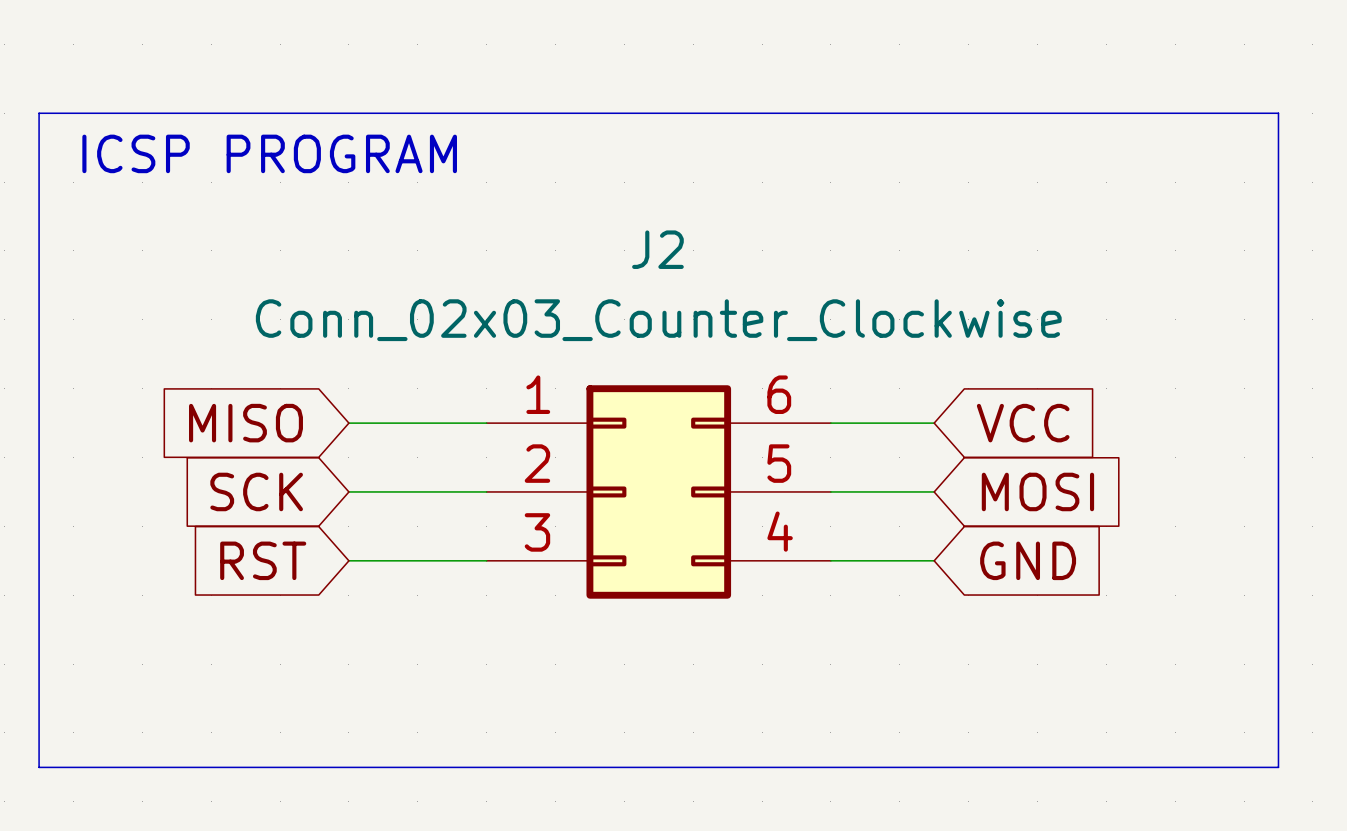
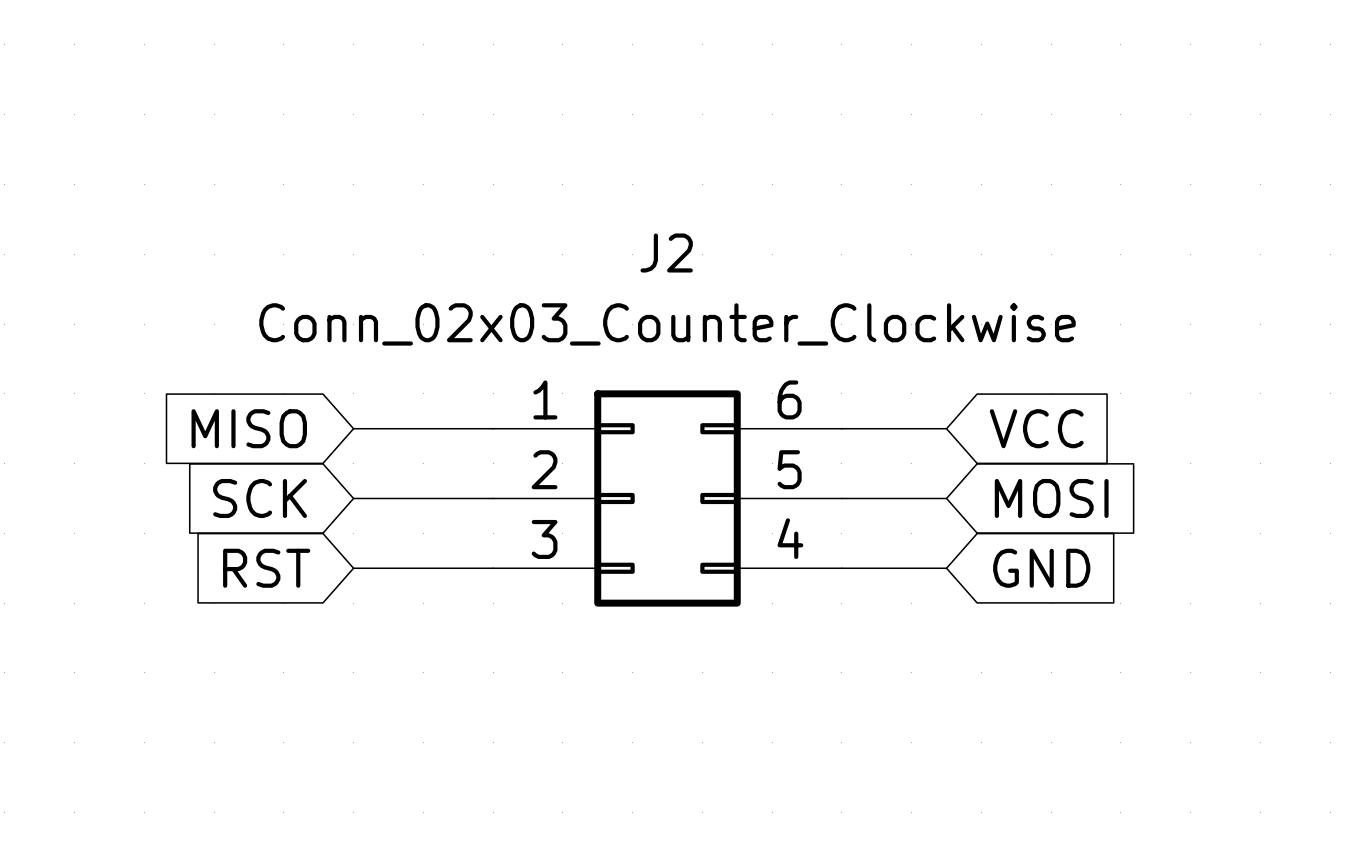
line: (39, 113) (1278, 113) (1278, 767) (39, 767) (39, 113) -> none
text: ICSP PROGRAM (269, 153) -> none

